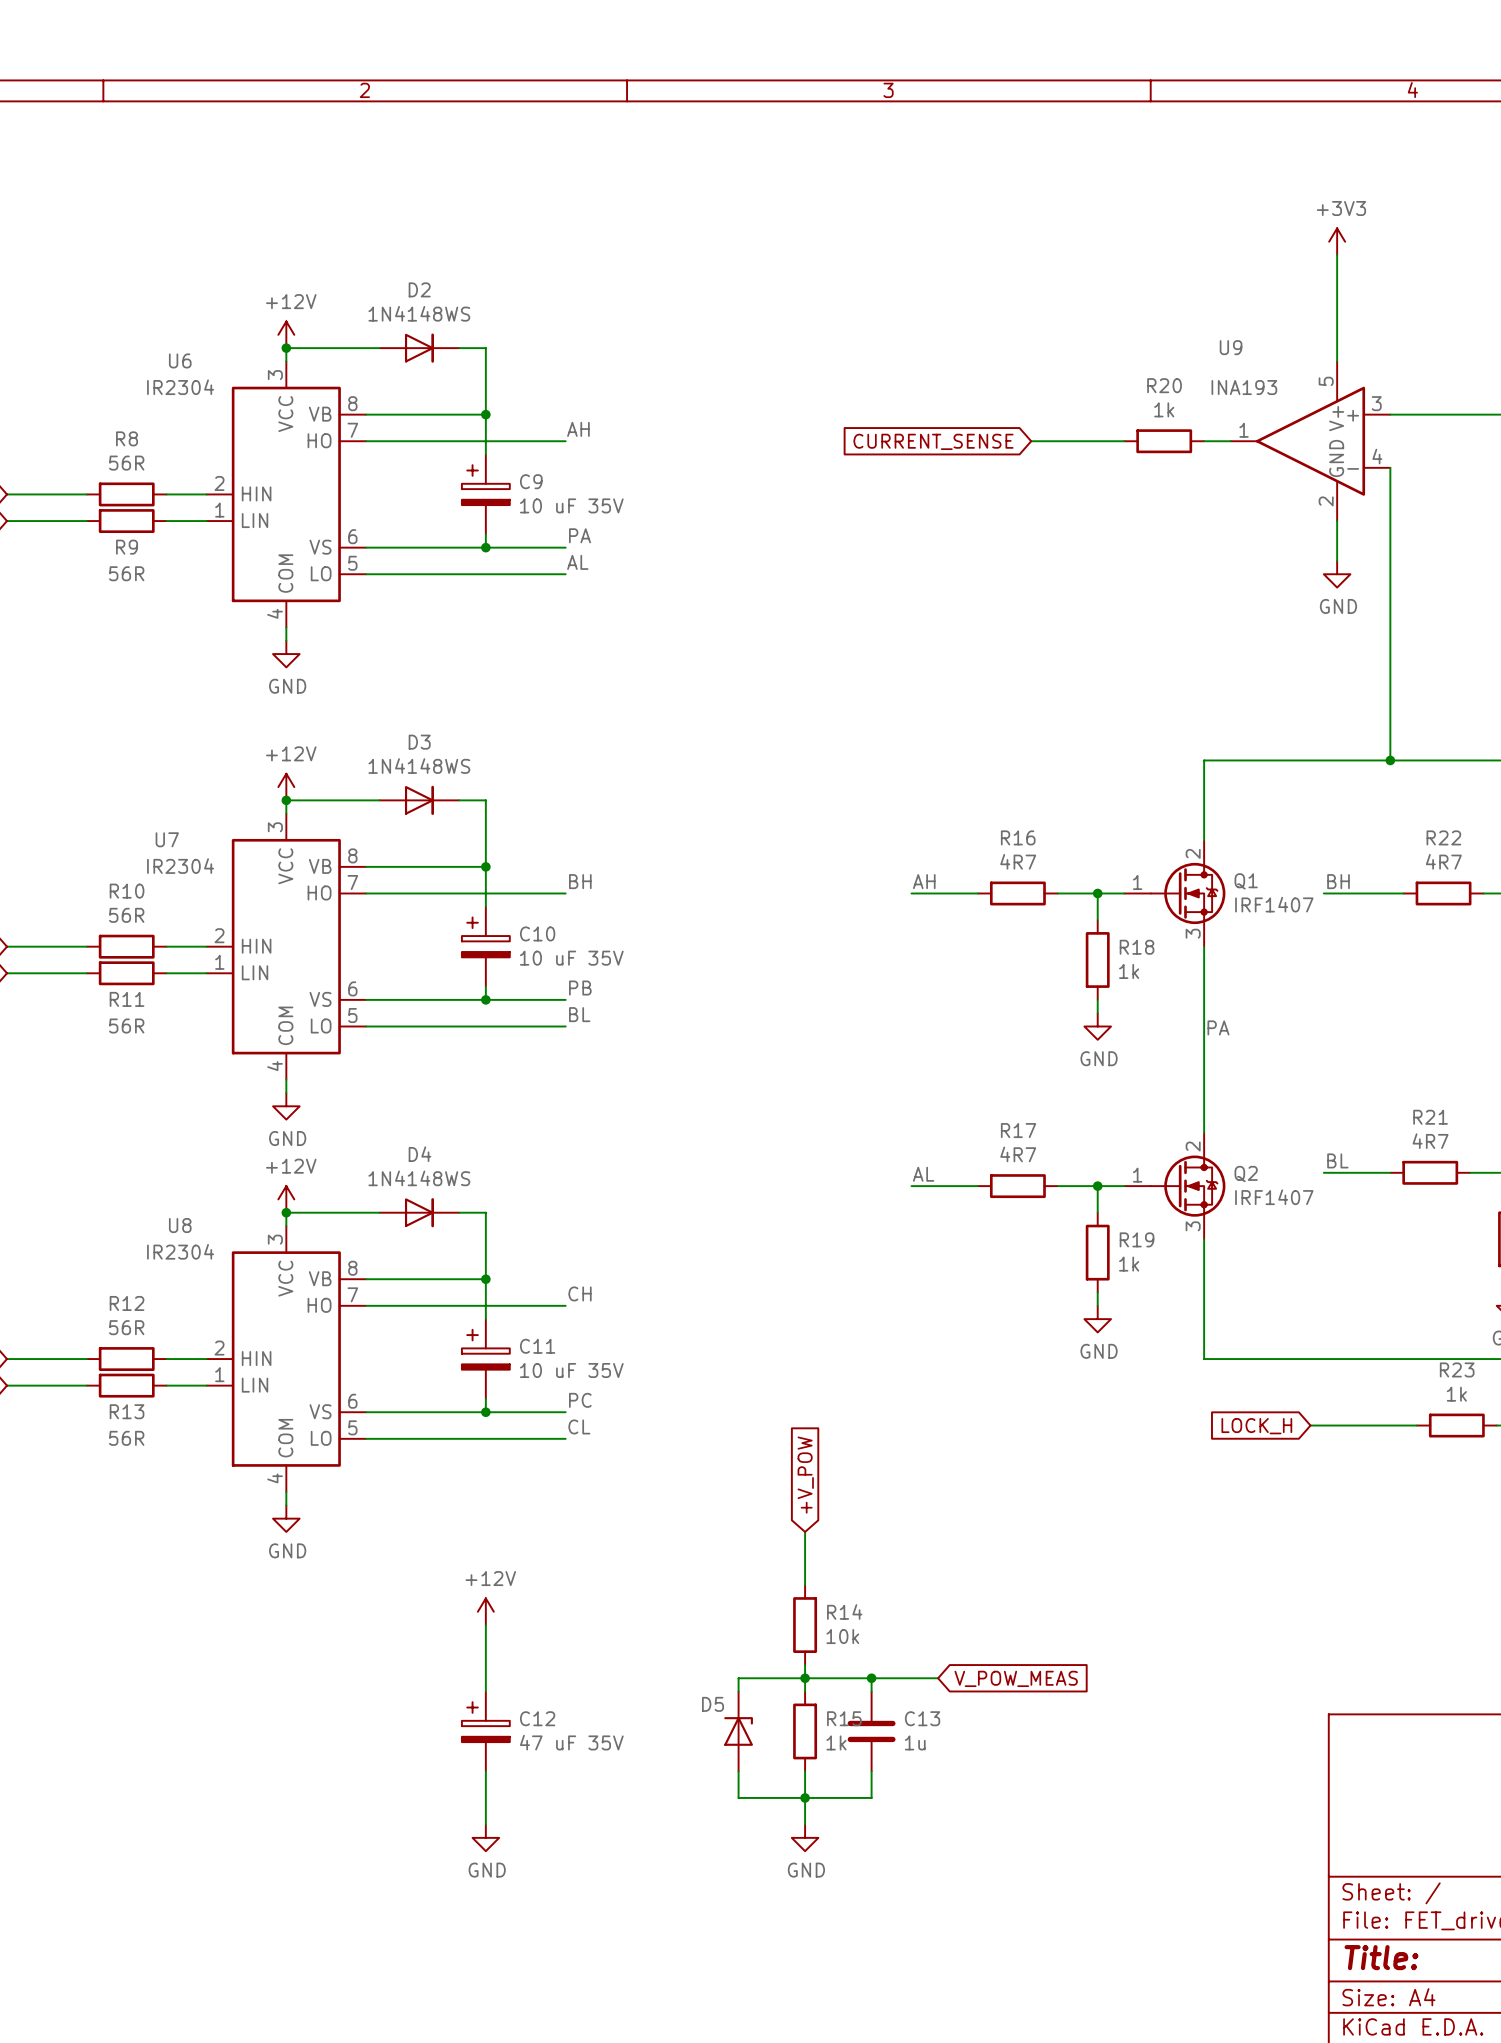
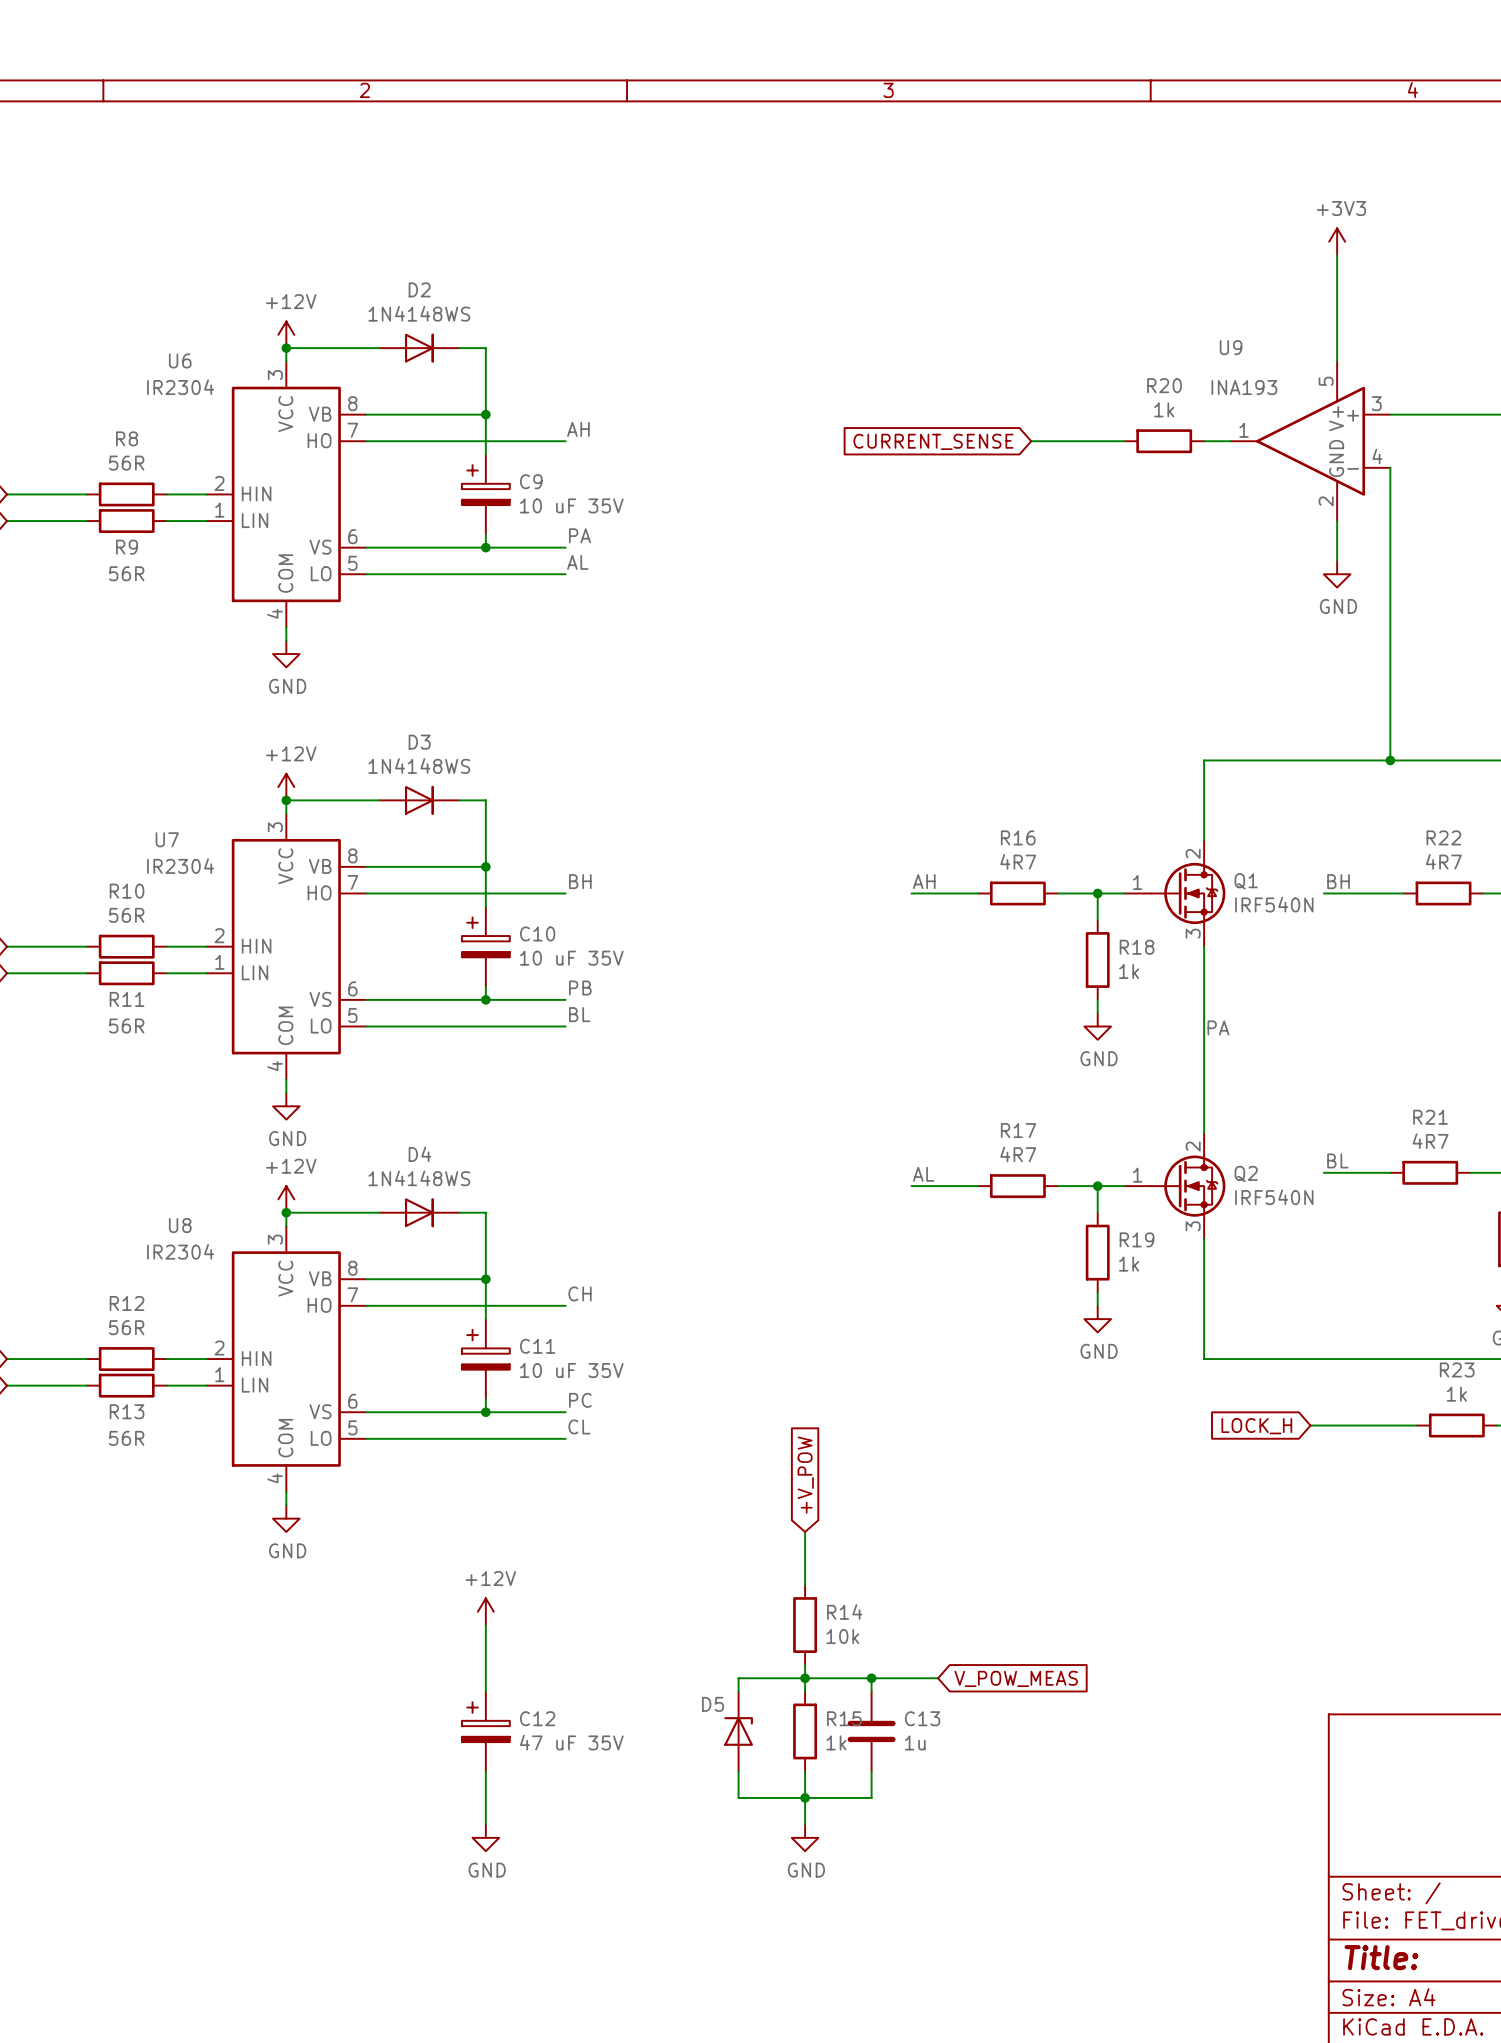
Q1 value: IRF1407 (1274, 904) -> IRF540N (1274, 904)
Q2 value: IRF1407 (1274, 1197) -> IRF540N (1274, 1197)

